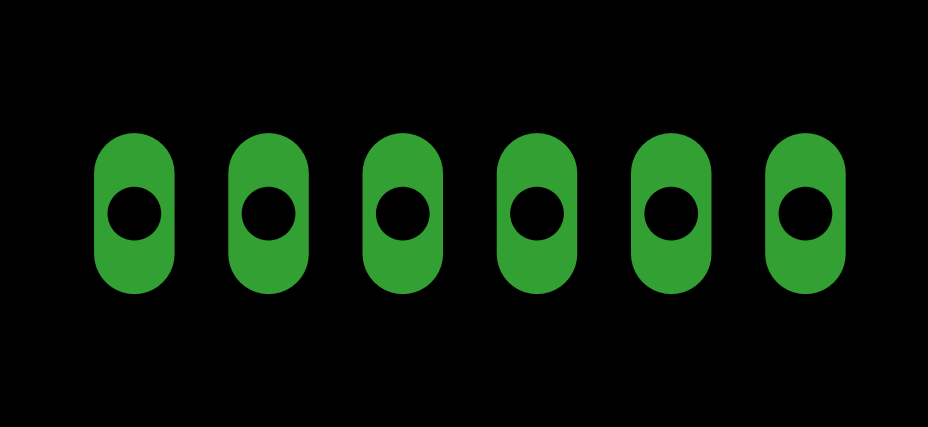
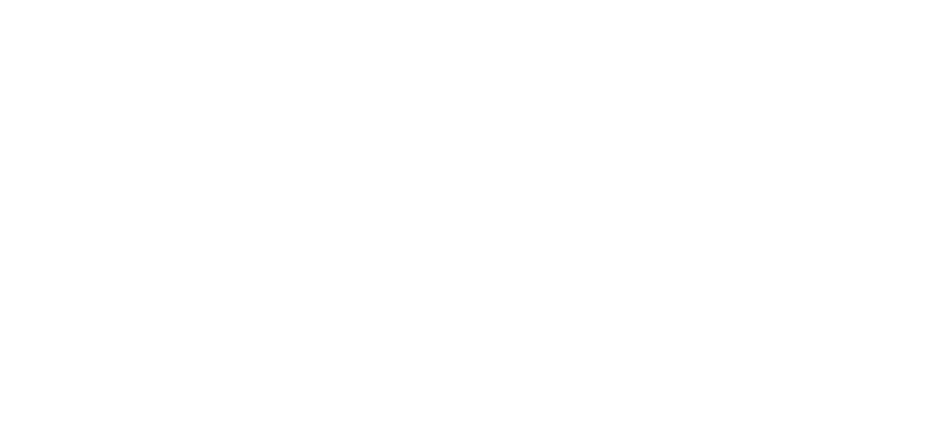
part: (469, 213) -> none

